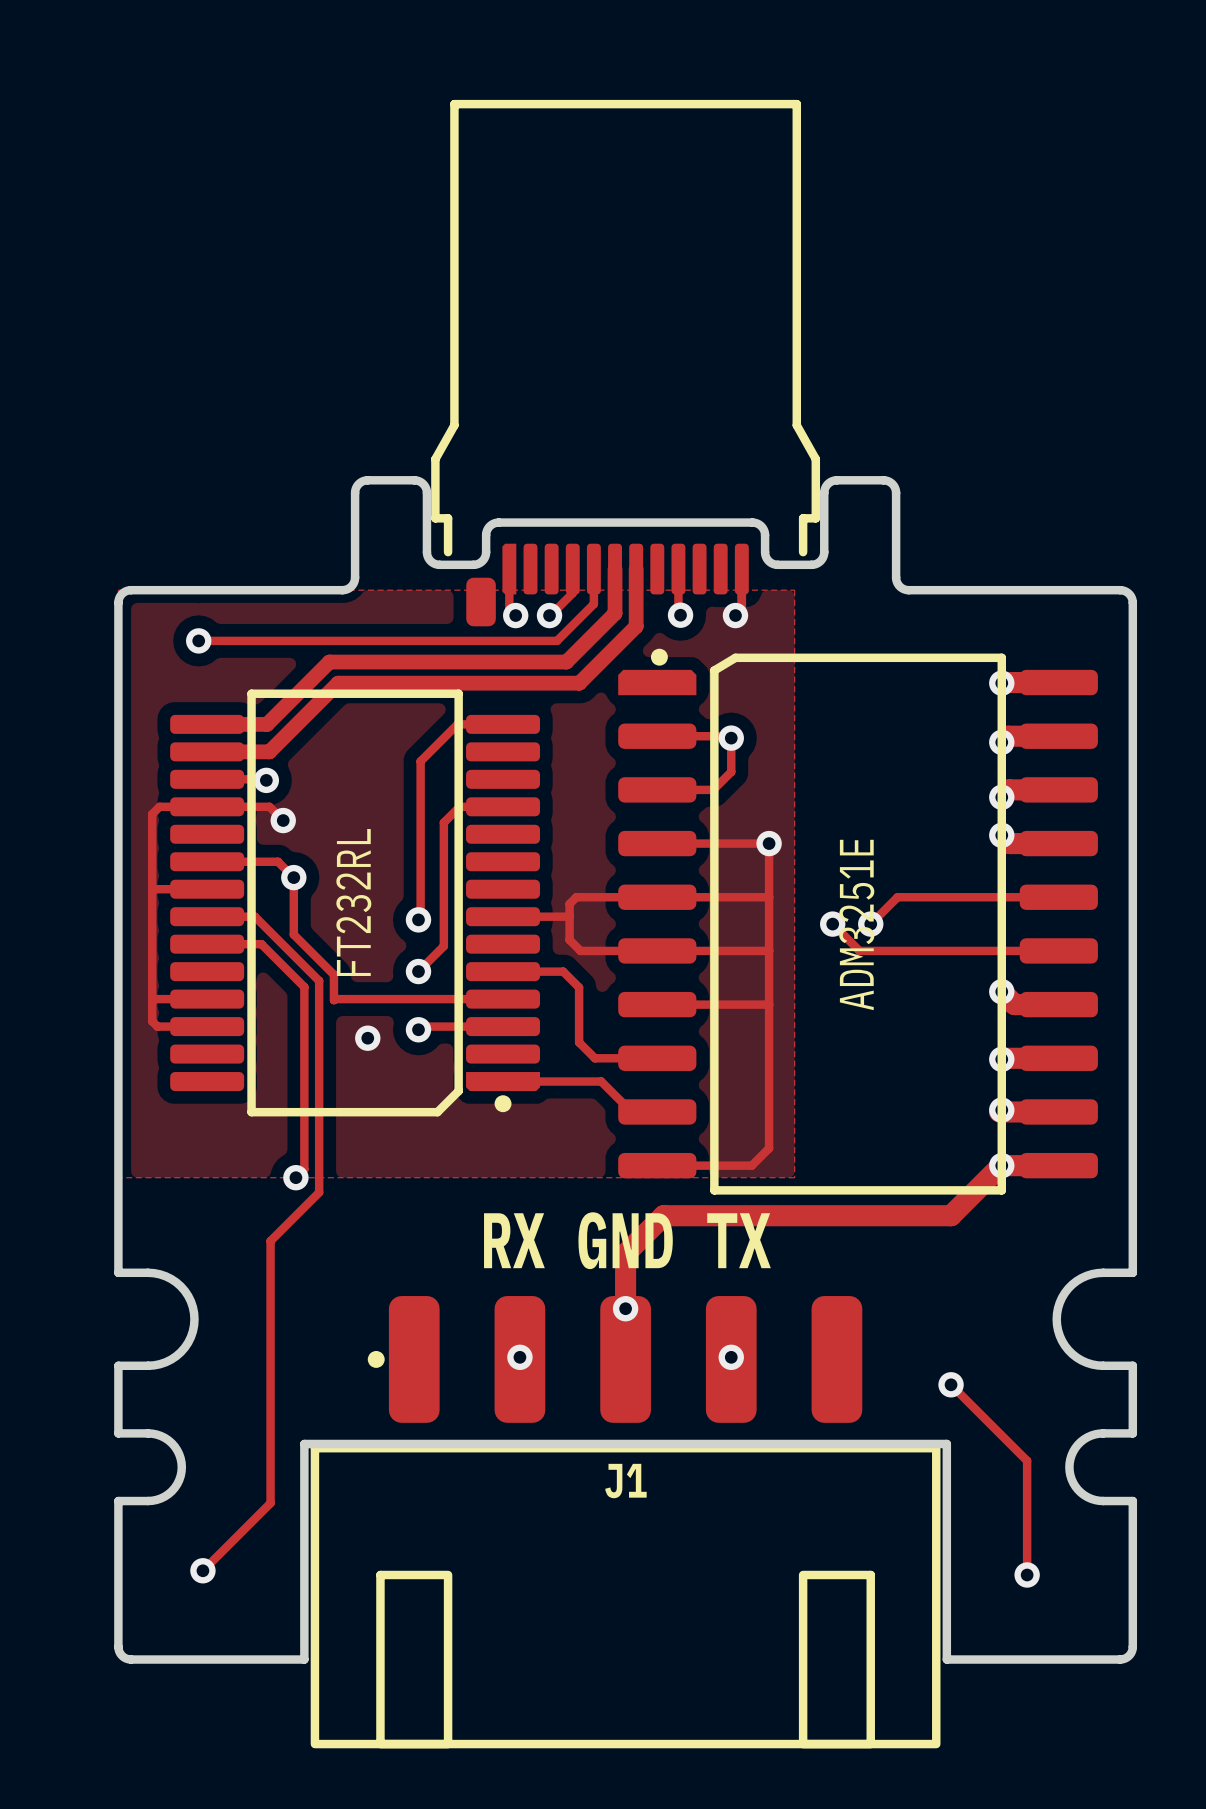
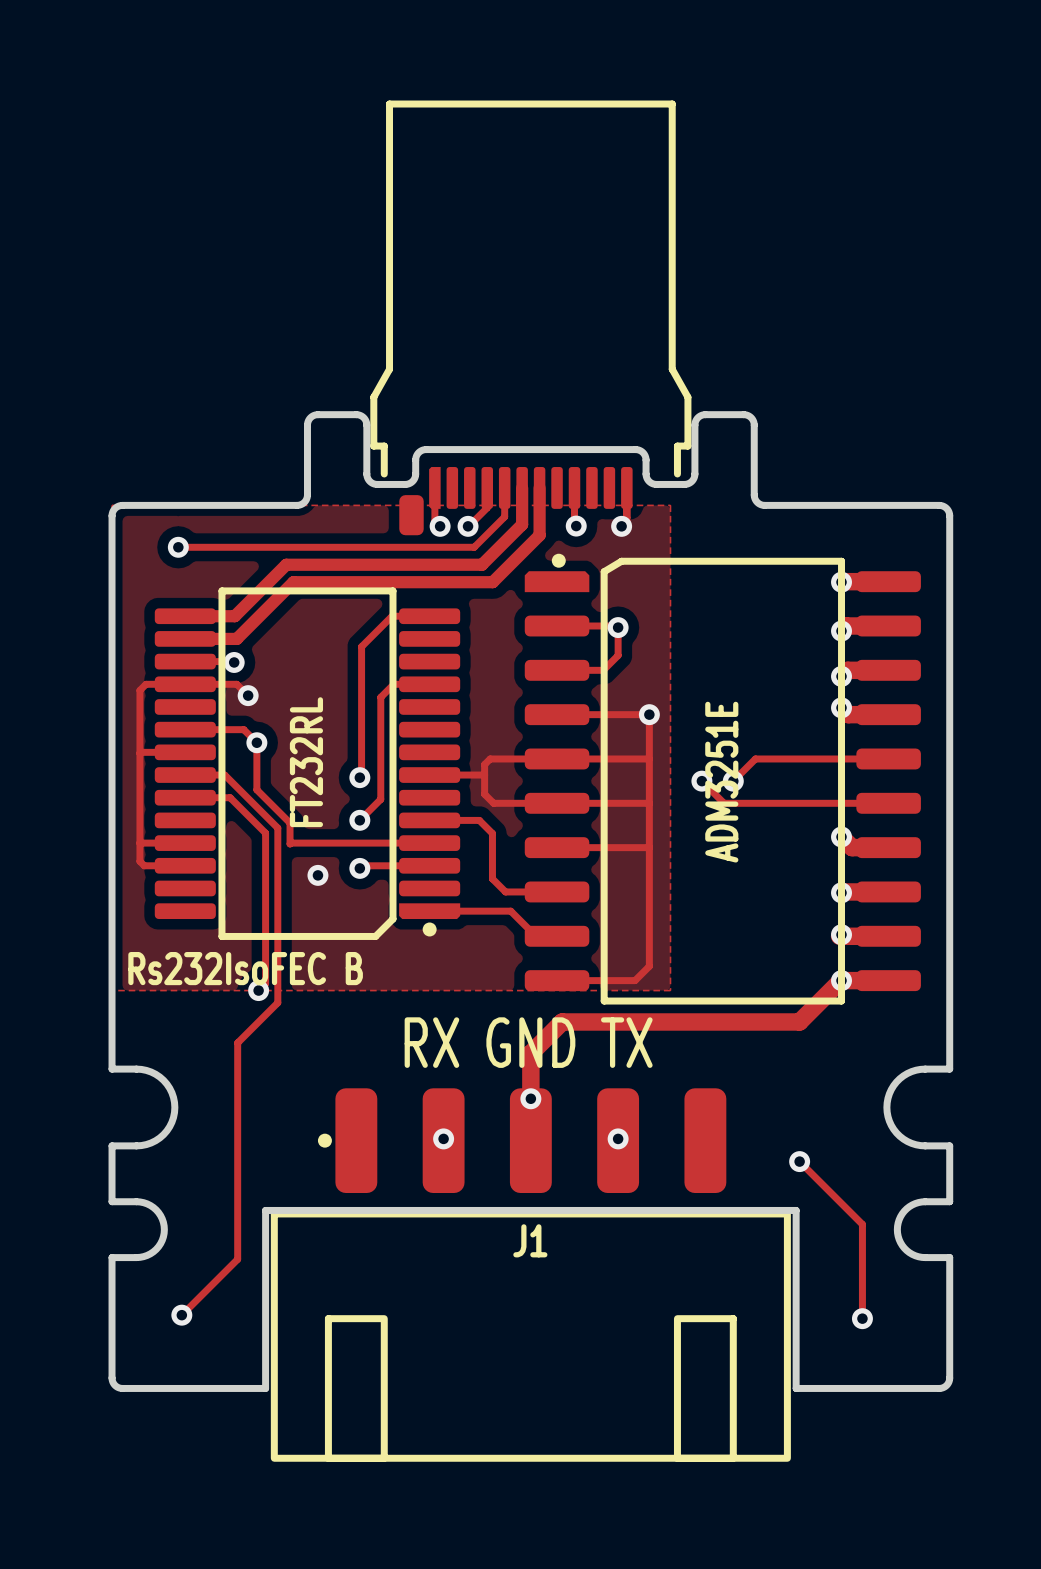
text: none -> Rs232IsoFEC B (245, 968)

